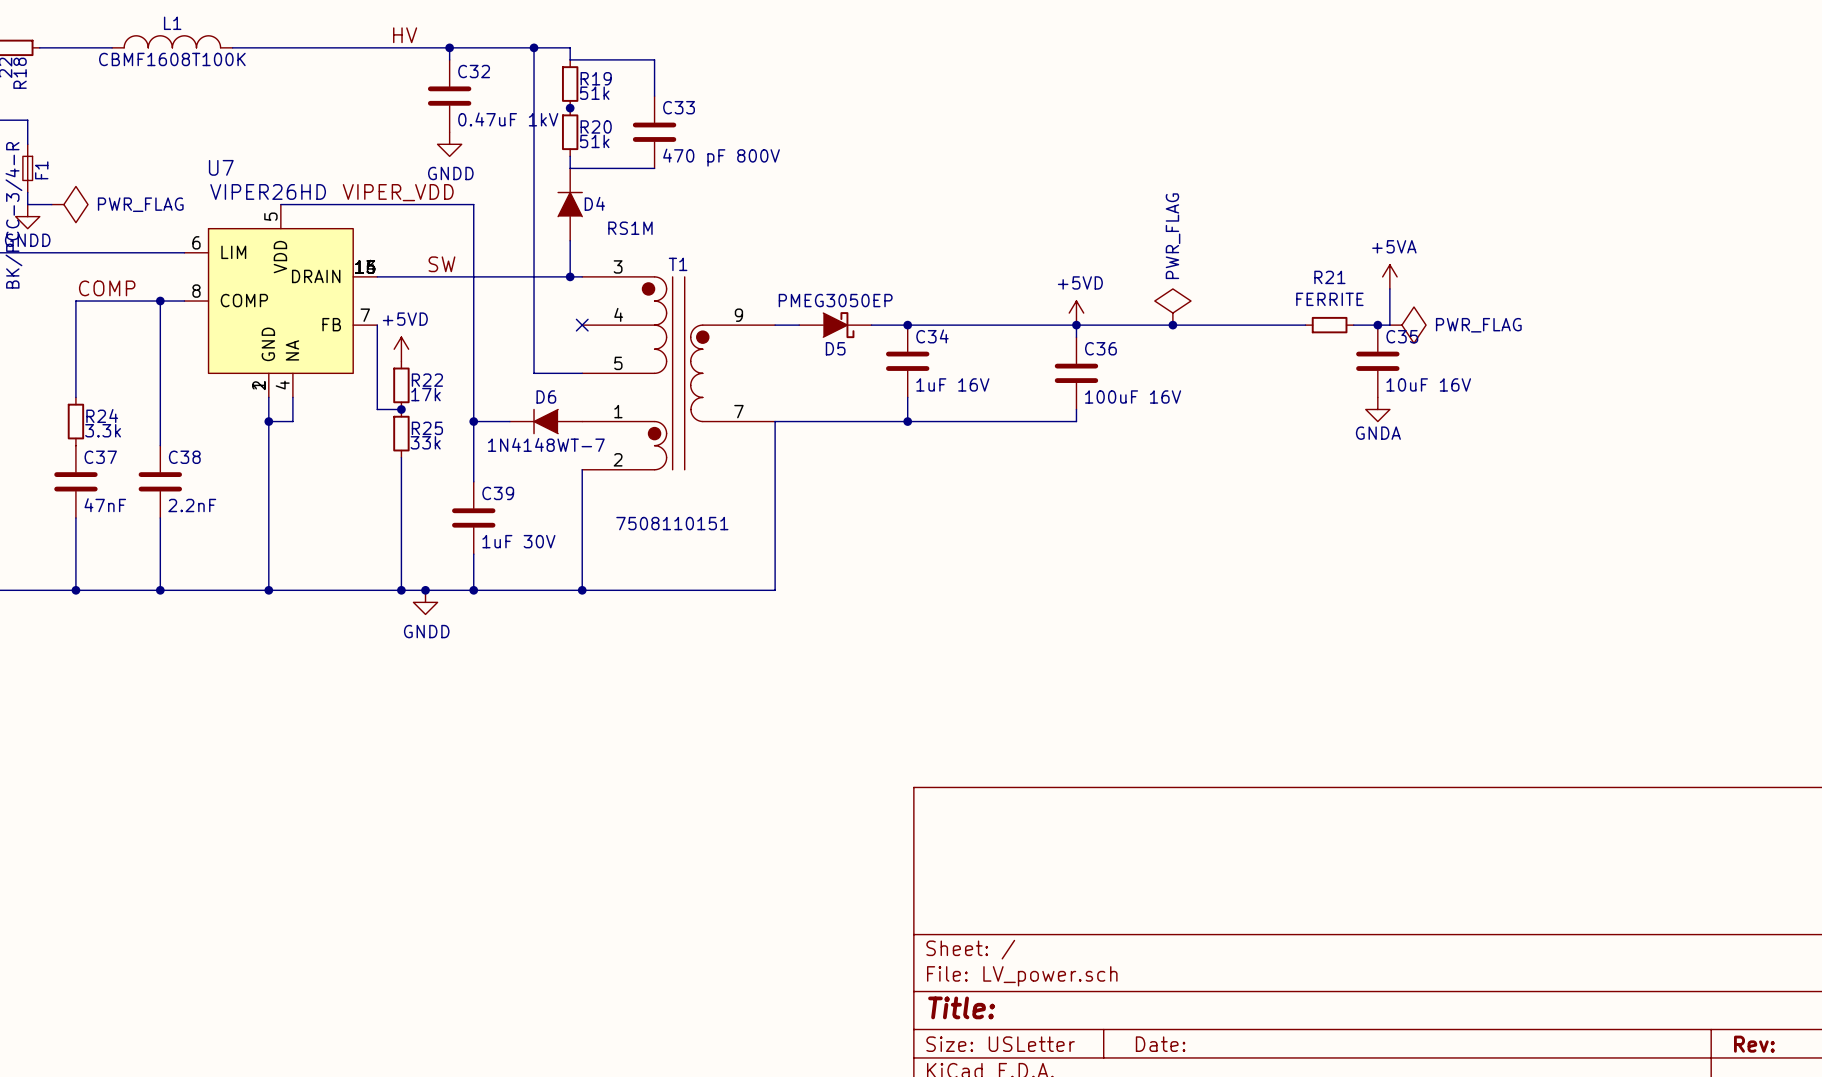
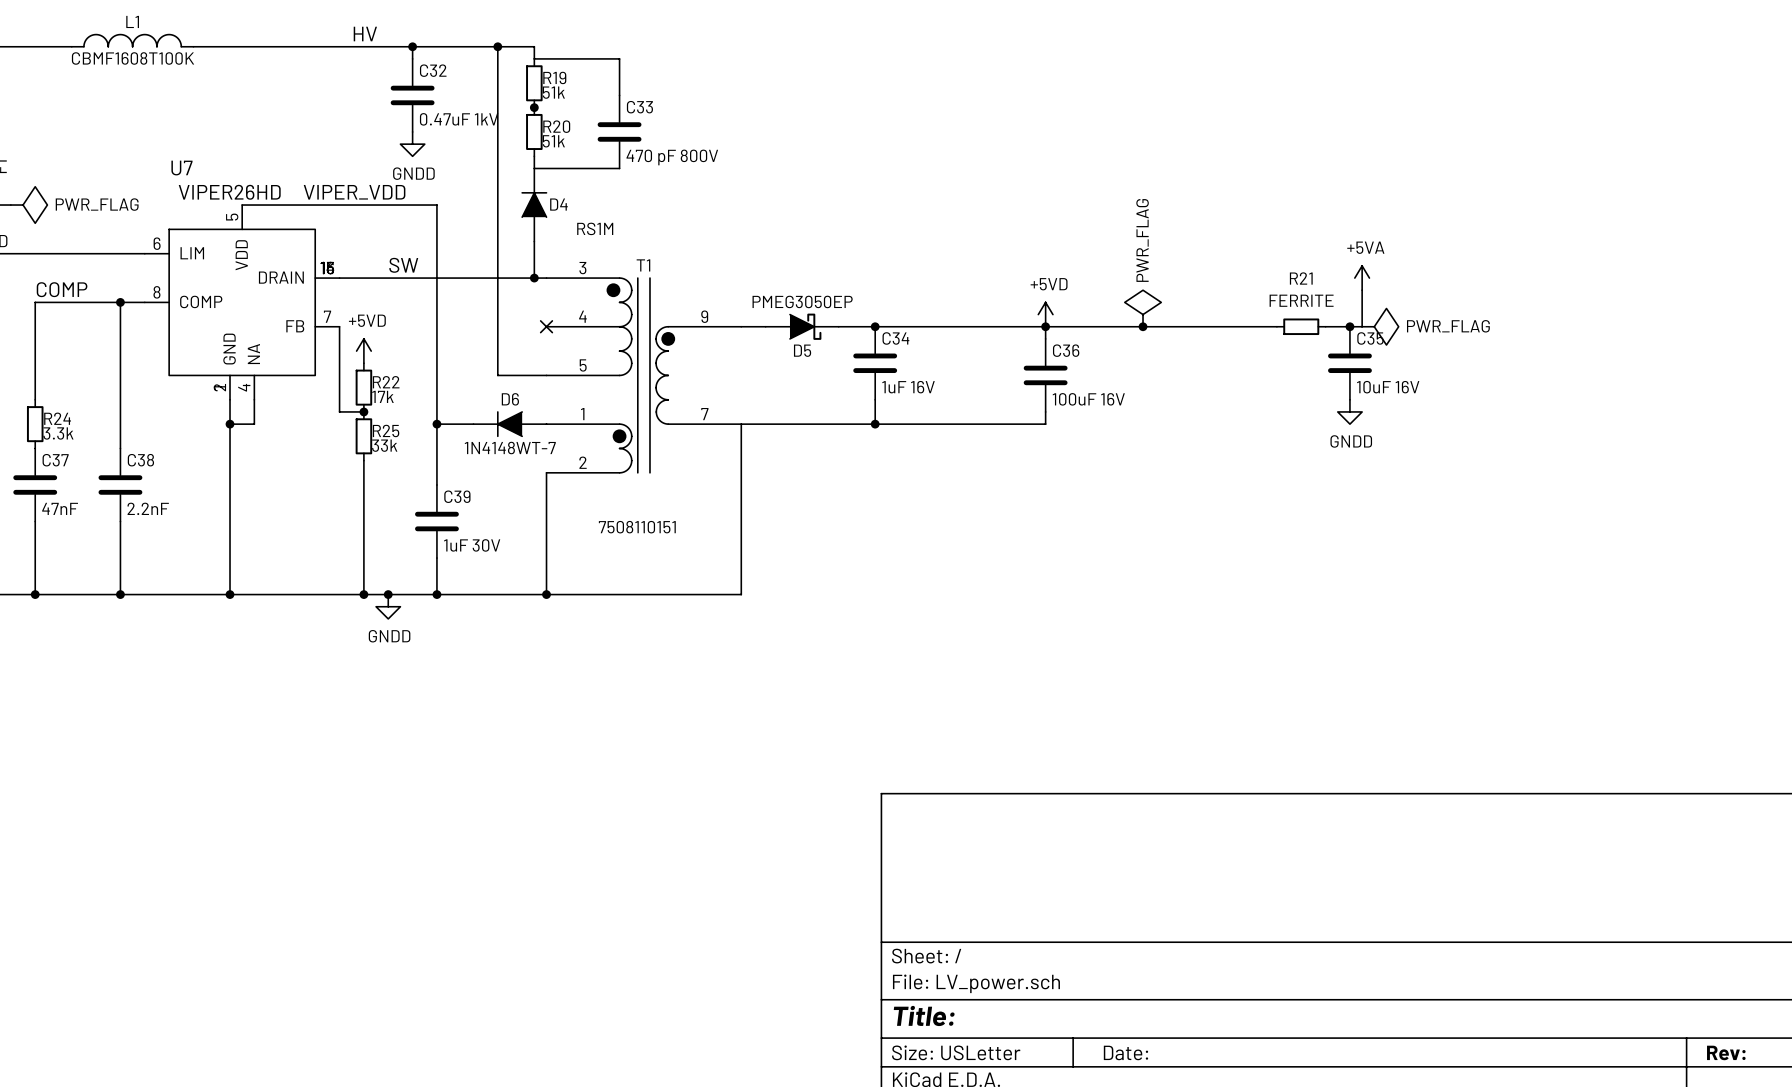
power symbol: GNDA (1377, 409) -> GNDD (1349, 411)

